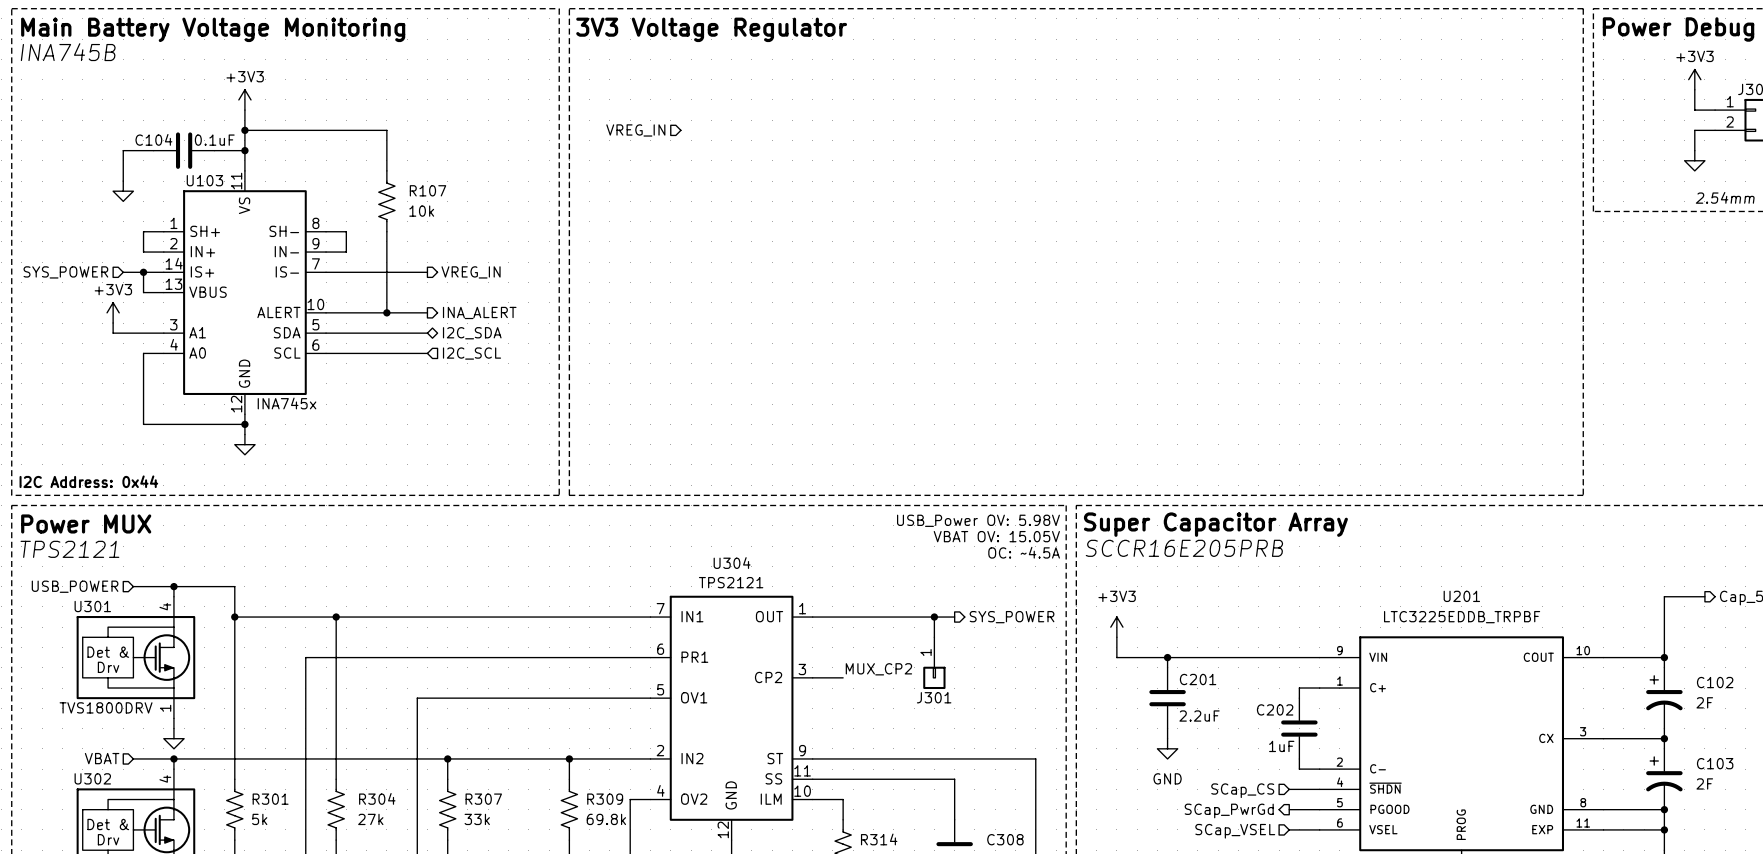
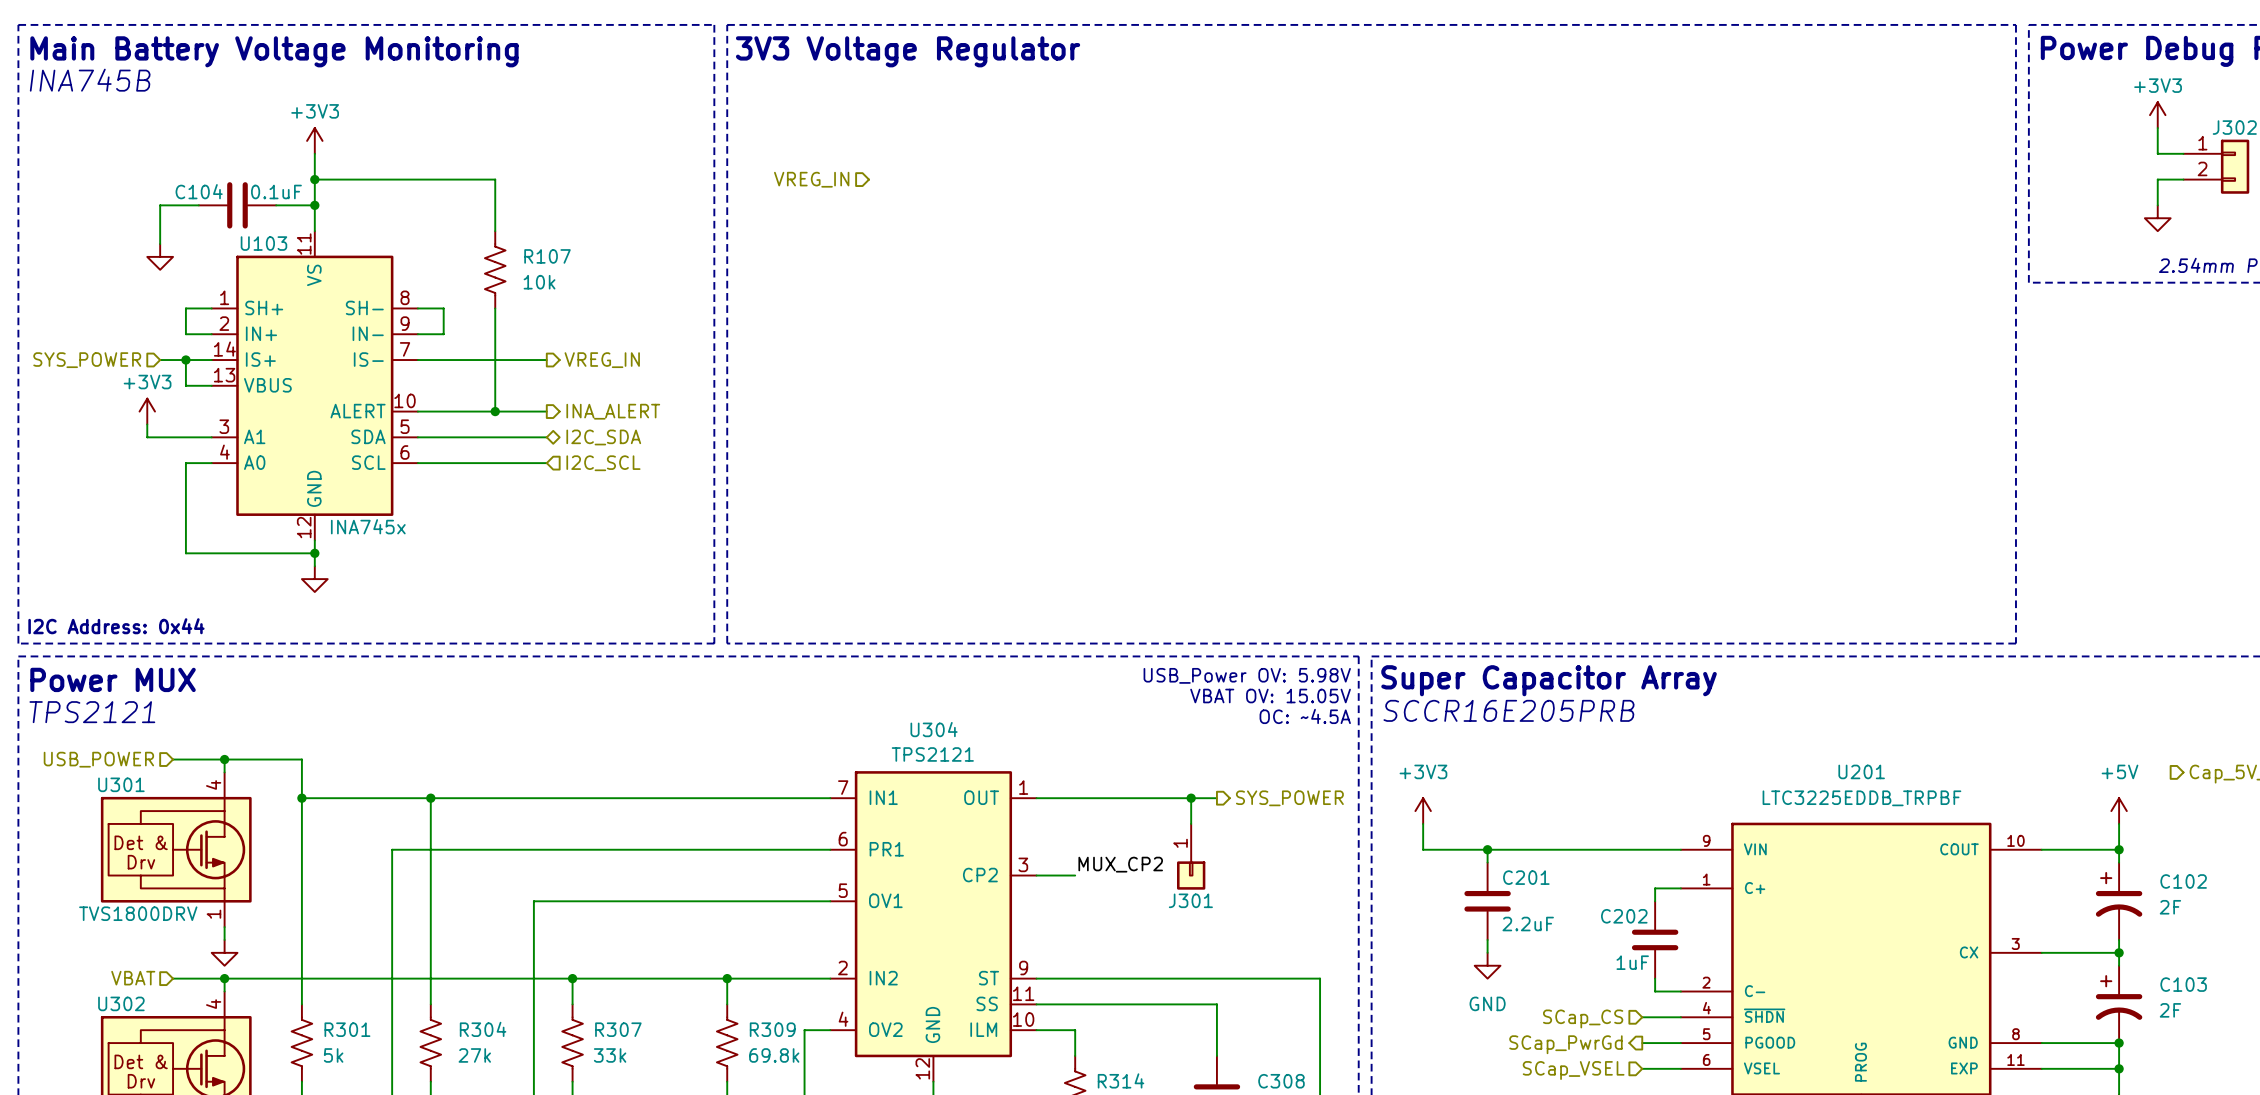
wire: (1704, 596) (1664, 596) (1664, 637) -> none
power symbol: none -> +5V (2119, 811)

